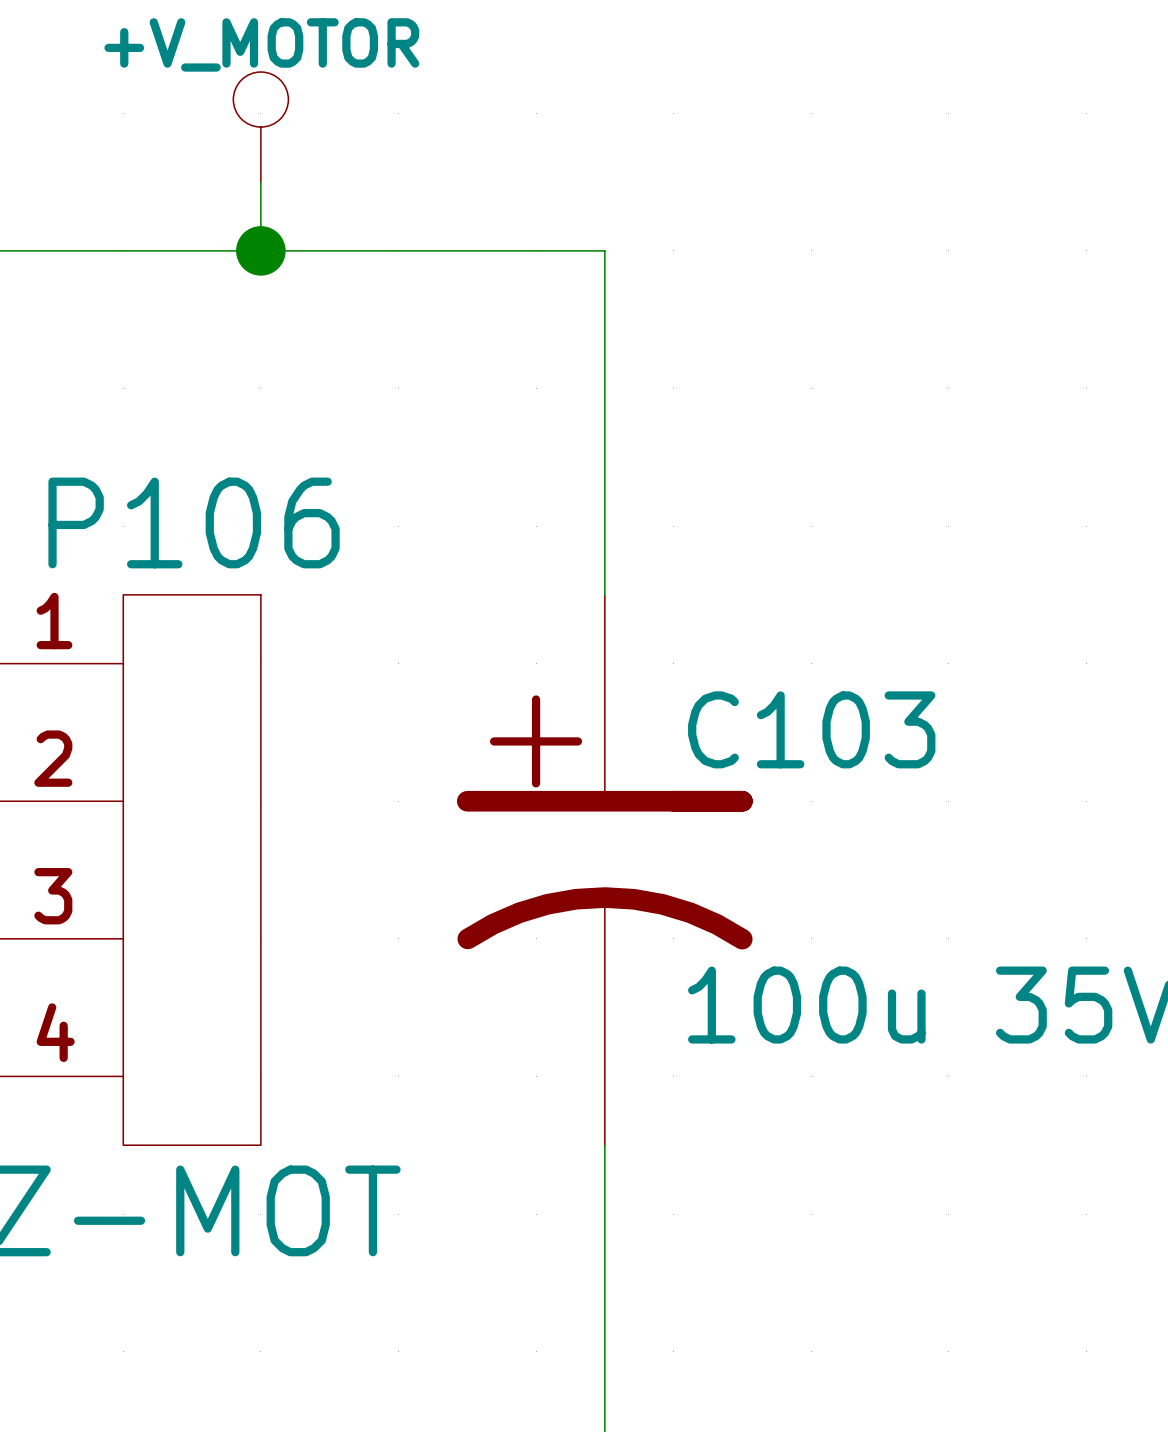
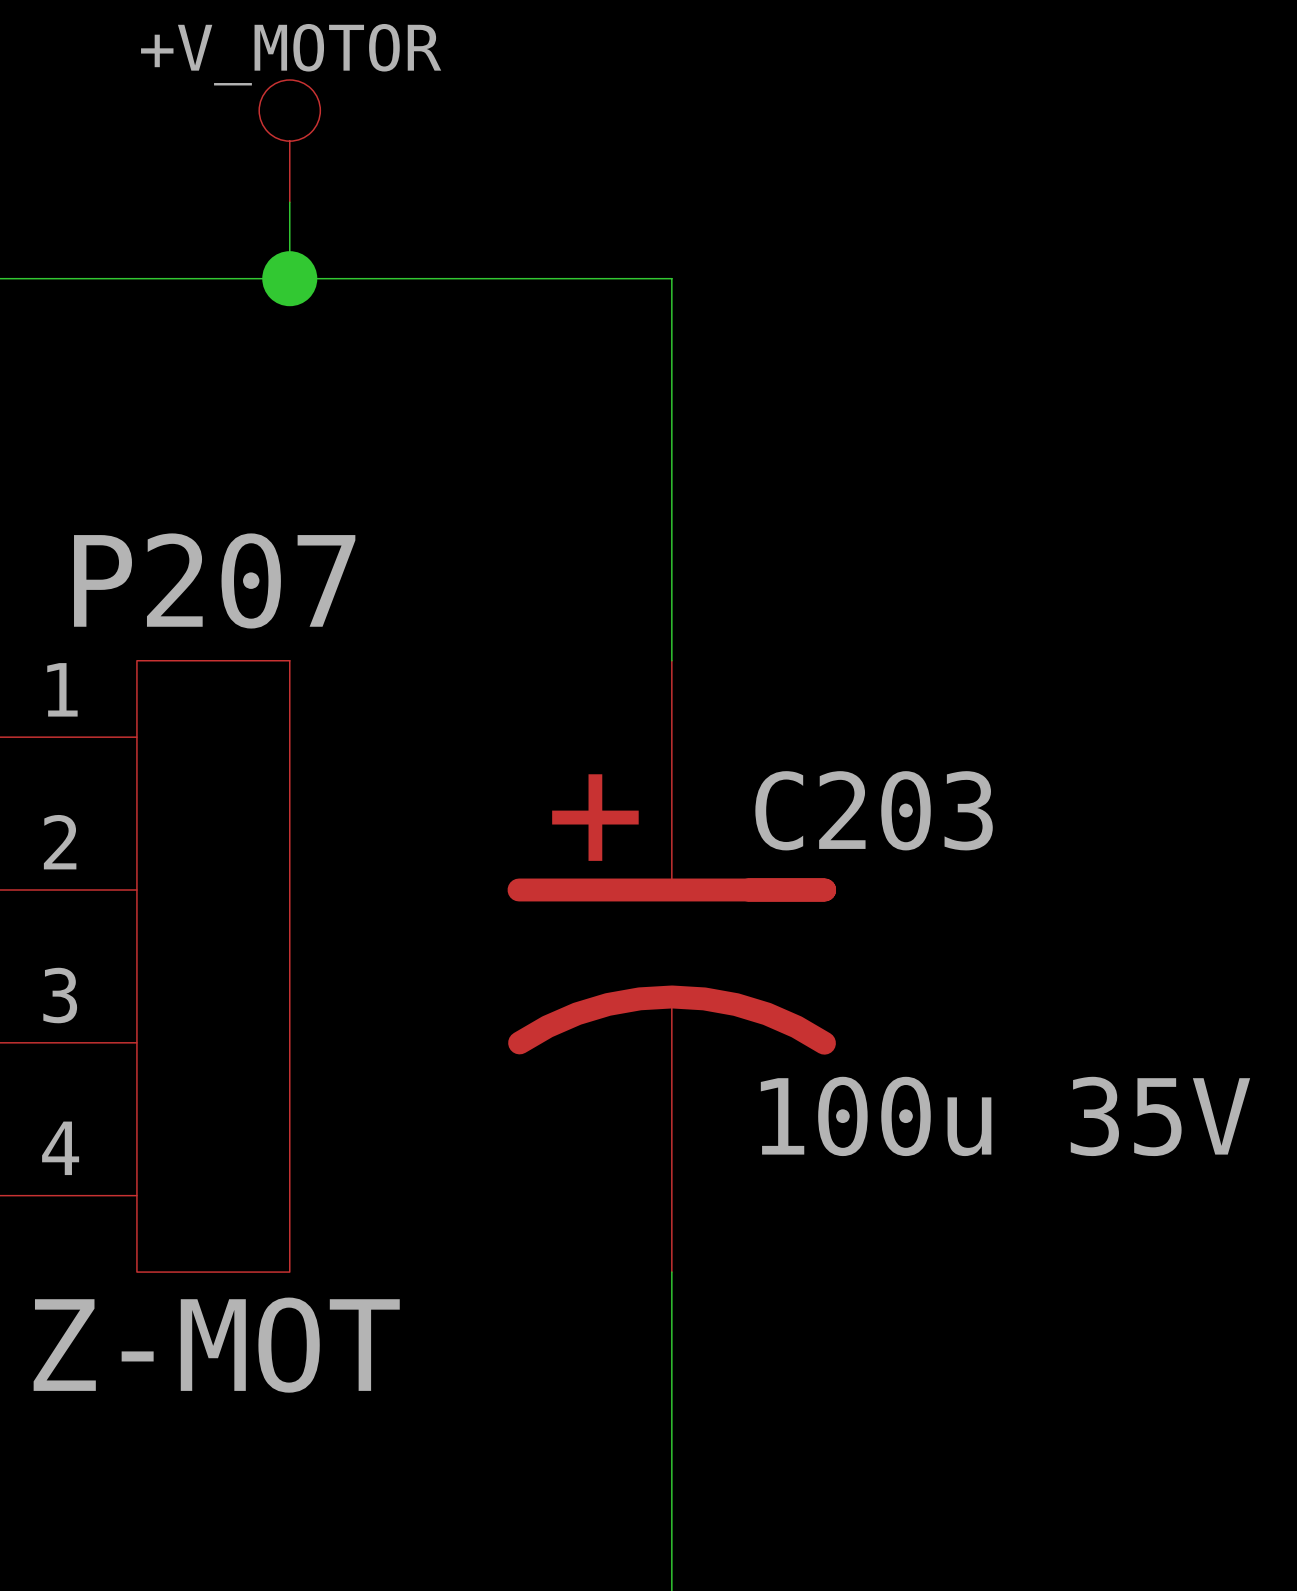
P106 name: P106 (194, 522) -> P207 (214, 580)
C103 name: C103 (811, 729) -> C203 (874, 810)

